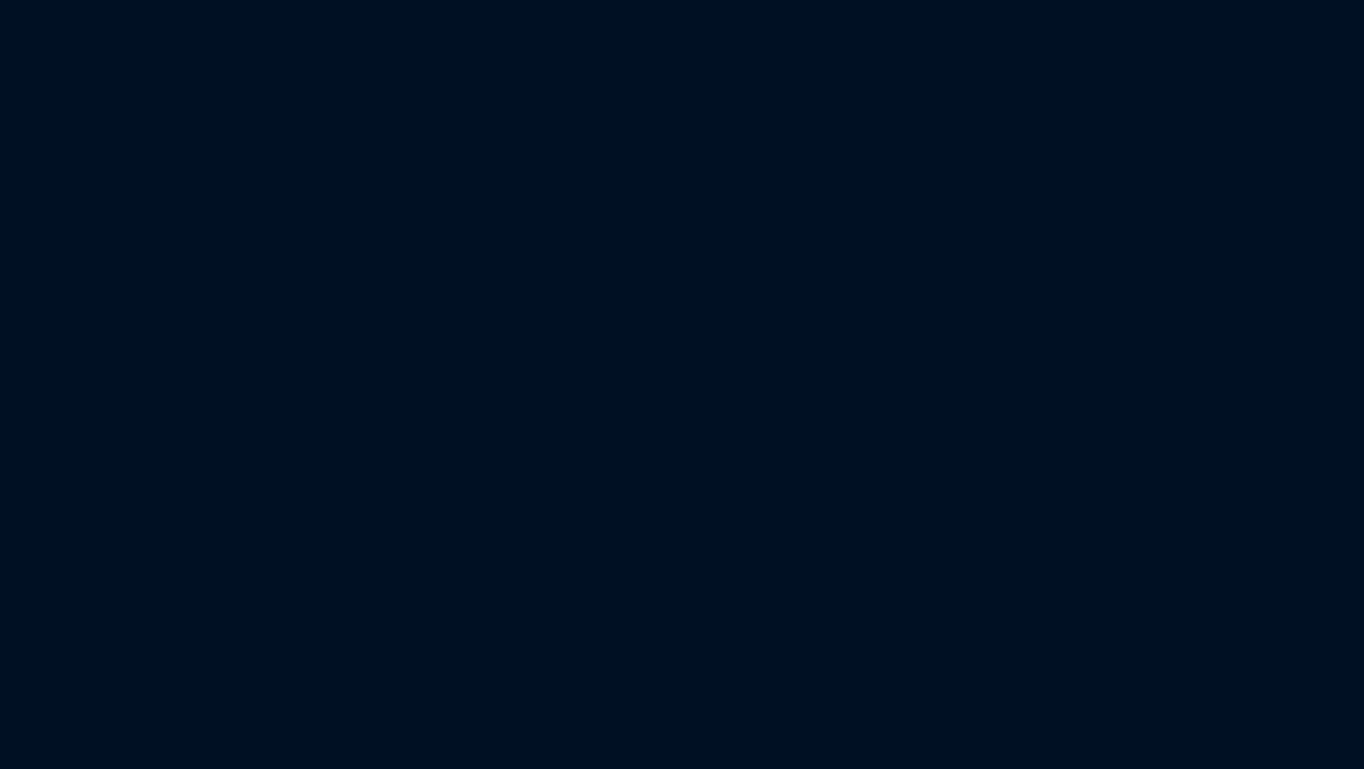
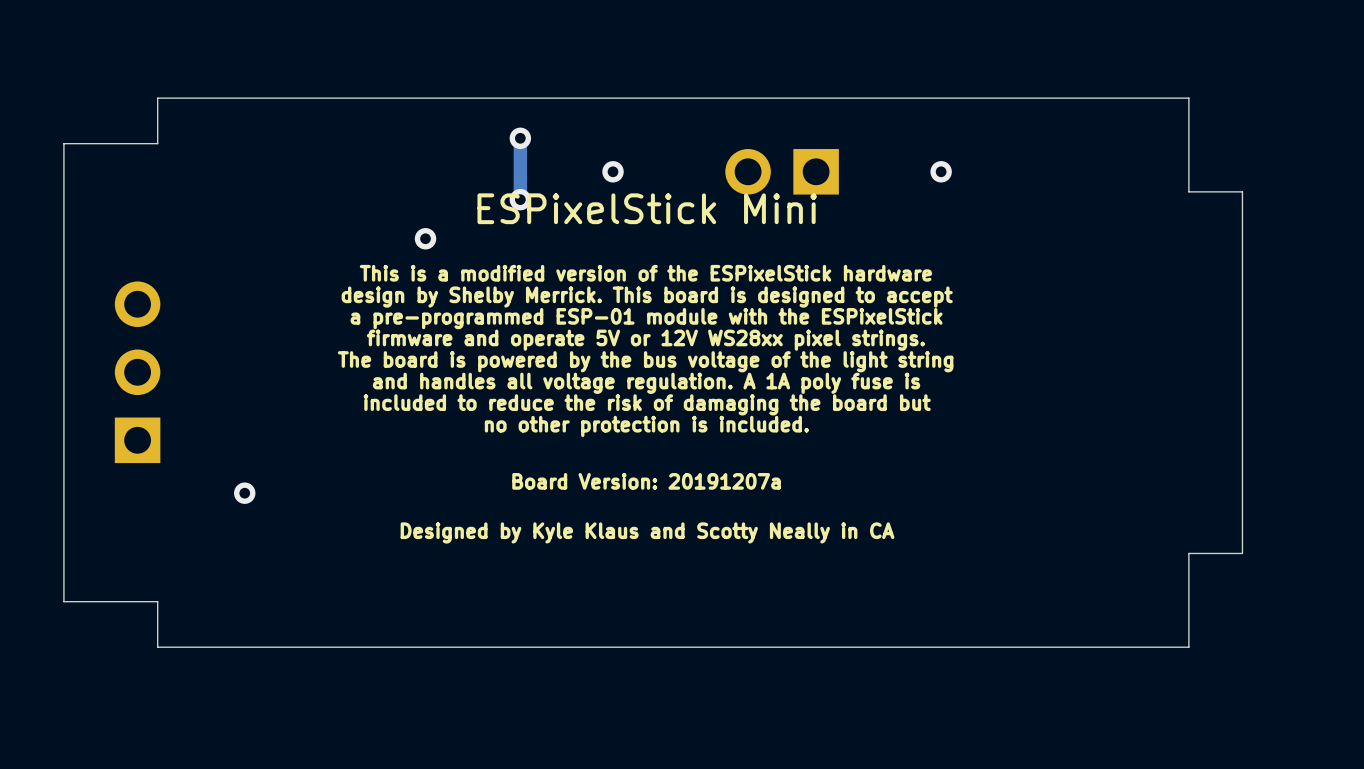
board edge: none -> (1188, 98) (1188, 191) (1242, 191) (1242, 553) (1188, 553) (1188, 647) (157, 647) (157, 601) (63, 601) (63, 143) (157, 143) (157, 98) (1188, 98)
track: none -> (520, 138) (520, 199)
via: none -> (520, 138)
via: none -> (613, 171)
part: none -> (782, 171)
via: none -> (941, 171)
via: none -> (520, 199)
text: none -> ESPixelStick Mini (647, 208)
via: none -> (425, 238)
text: none -> This is a modified version of the ESPixelStick hardware (645, 273)
text: none -> design by Shelby Merrick. This board is designed to accept (647, 297)
text: none -> a pre-programmed ESP-01 module with the ESPixelStick (646, 318)
text: none -> firmware and operate 5V or 12V WS28xx pixel strings. (645, 340)
text: none -> The board is powered by the bus voltage of the light string (645, 361)
part: none -> (137, 372)
text: none -> and handles all voltage regulation. A 1A poly fuse is (646, 383)
text: none -> included to reduce the risk of damaging the board but (647, 404)
text: none -> no other protection is included. (646, 426)
text: none -> Board Version: 20191207a (646, 481)
via: none -> (244, 493)
text: none -> Designed by Kyle Klaus and Scotty Neally in CA (647, 532)

